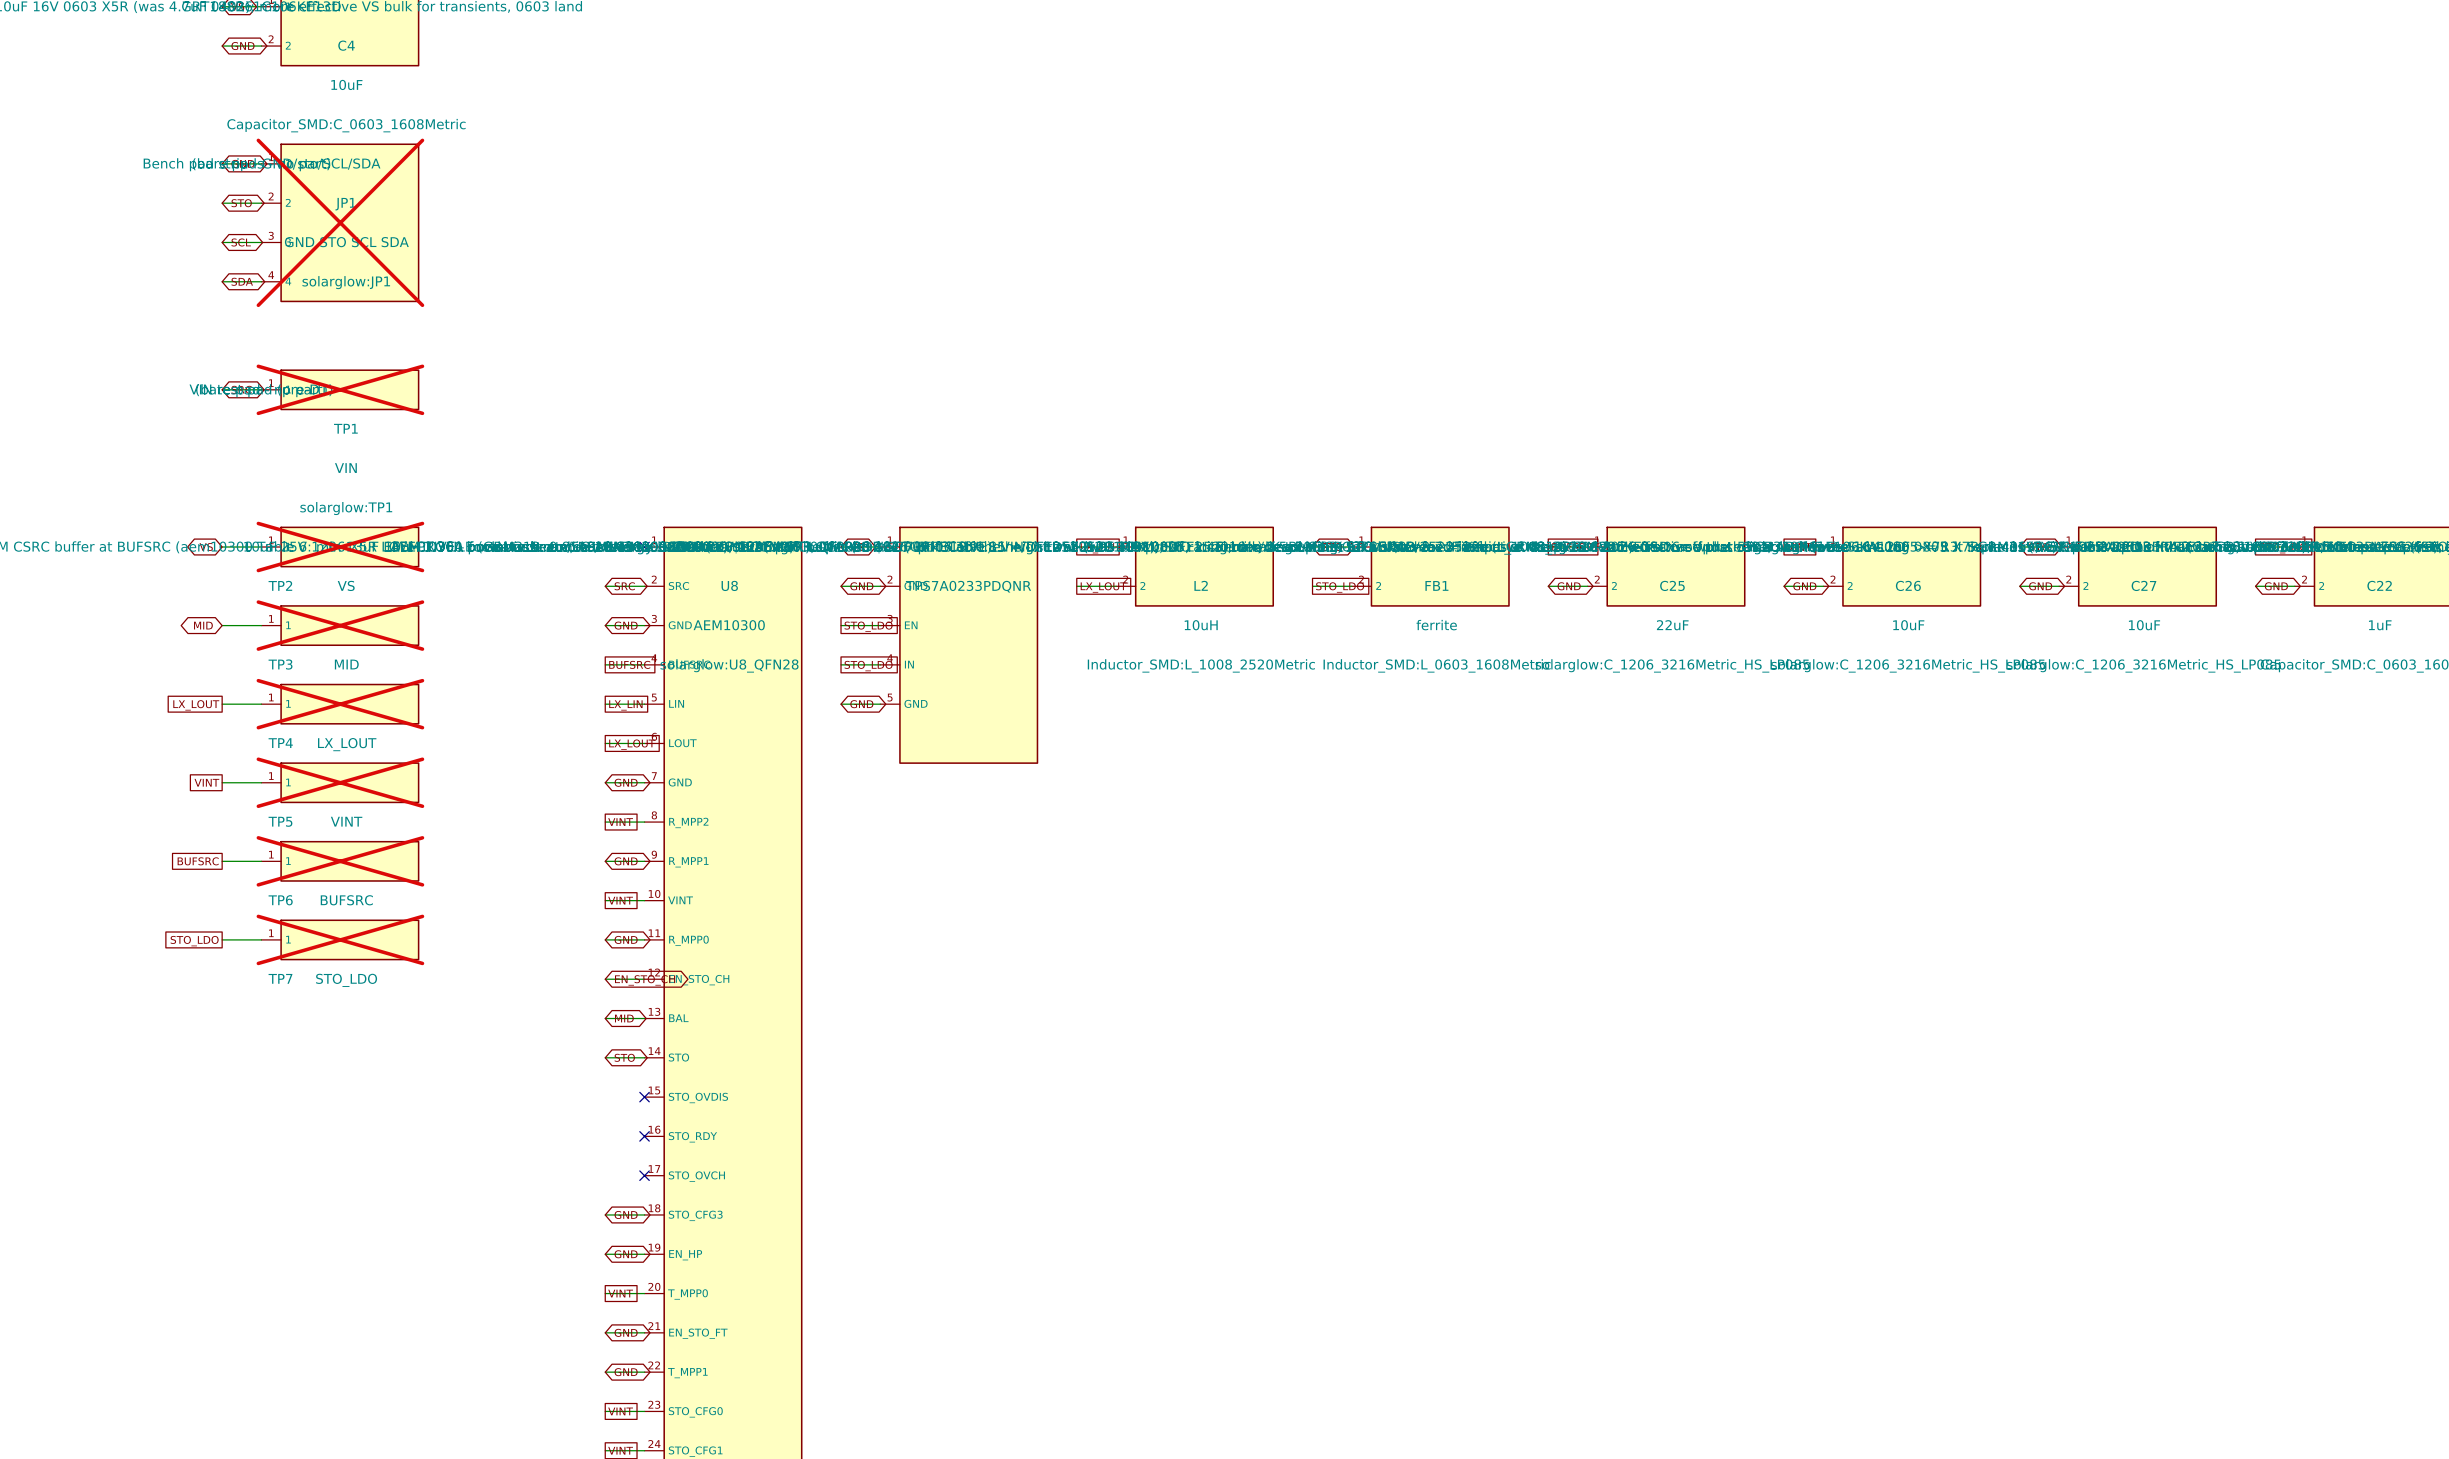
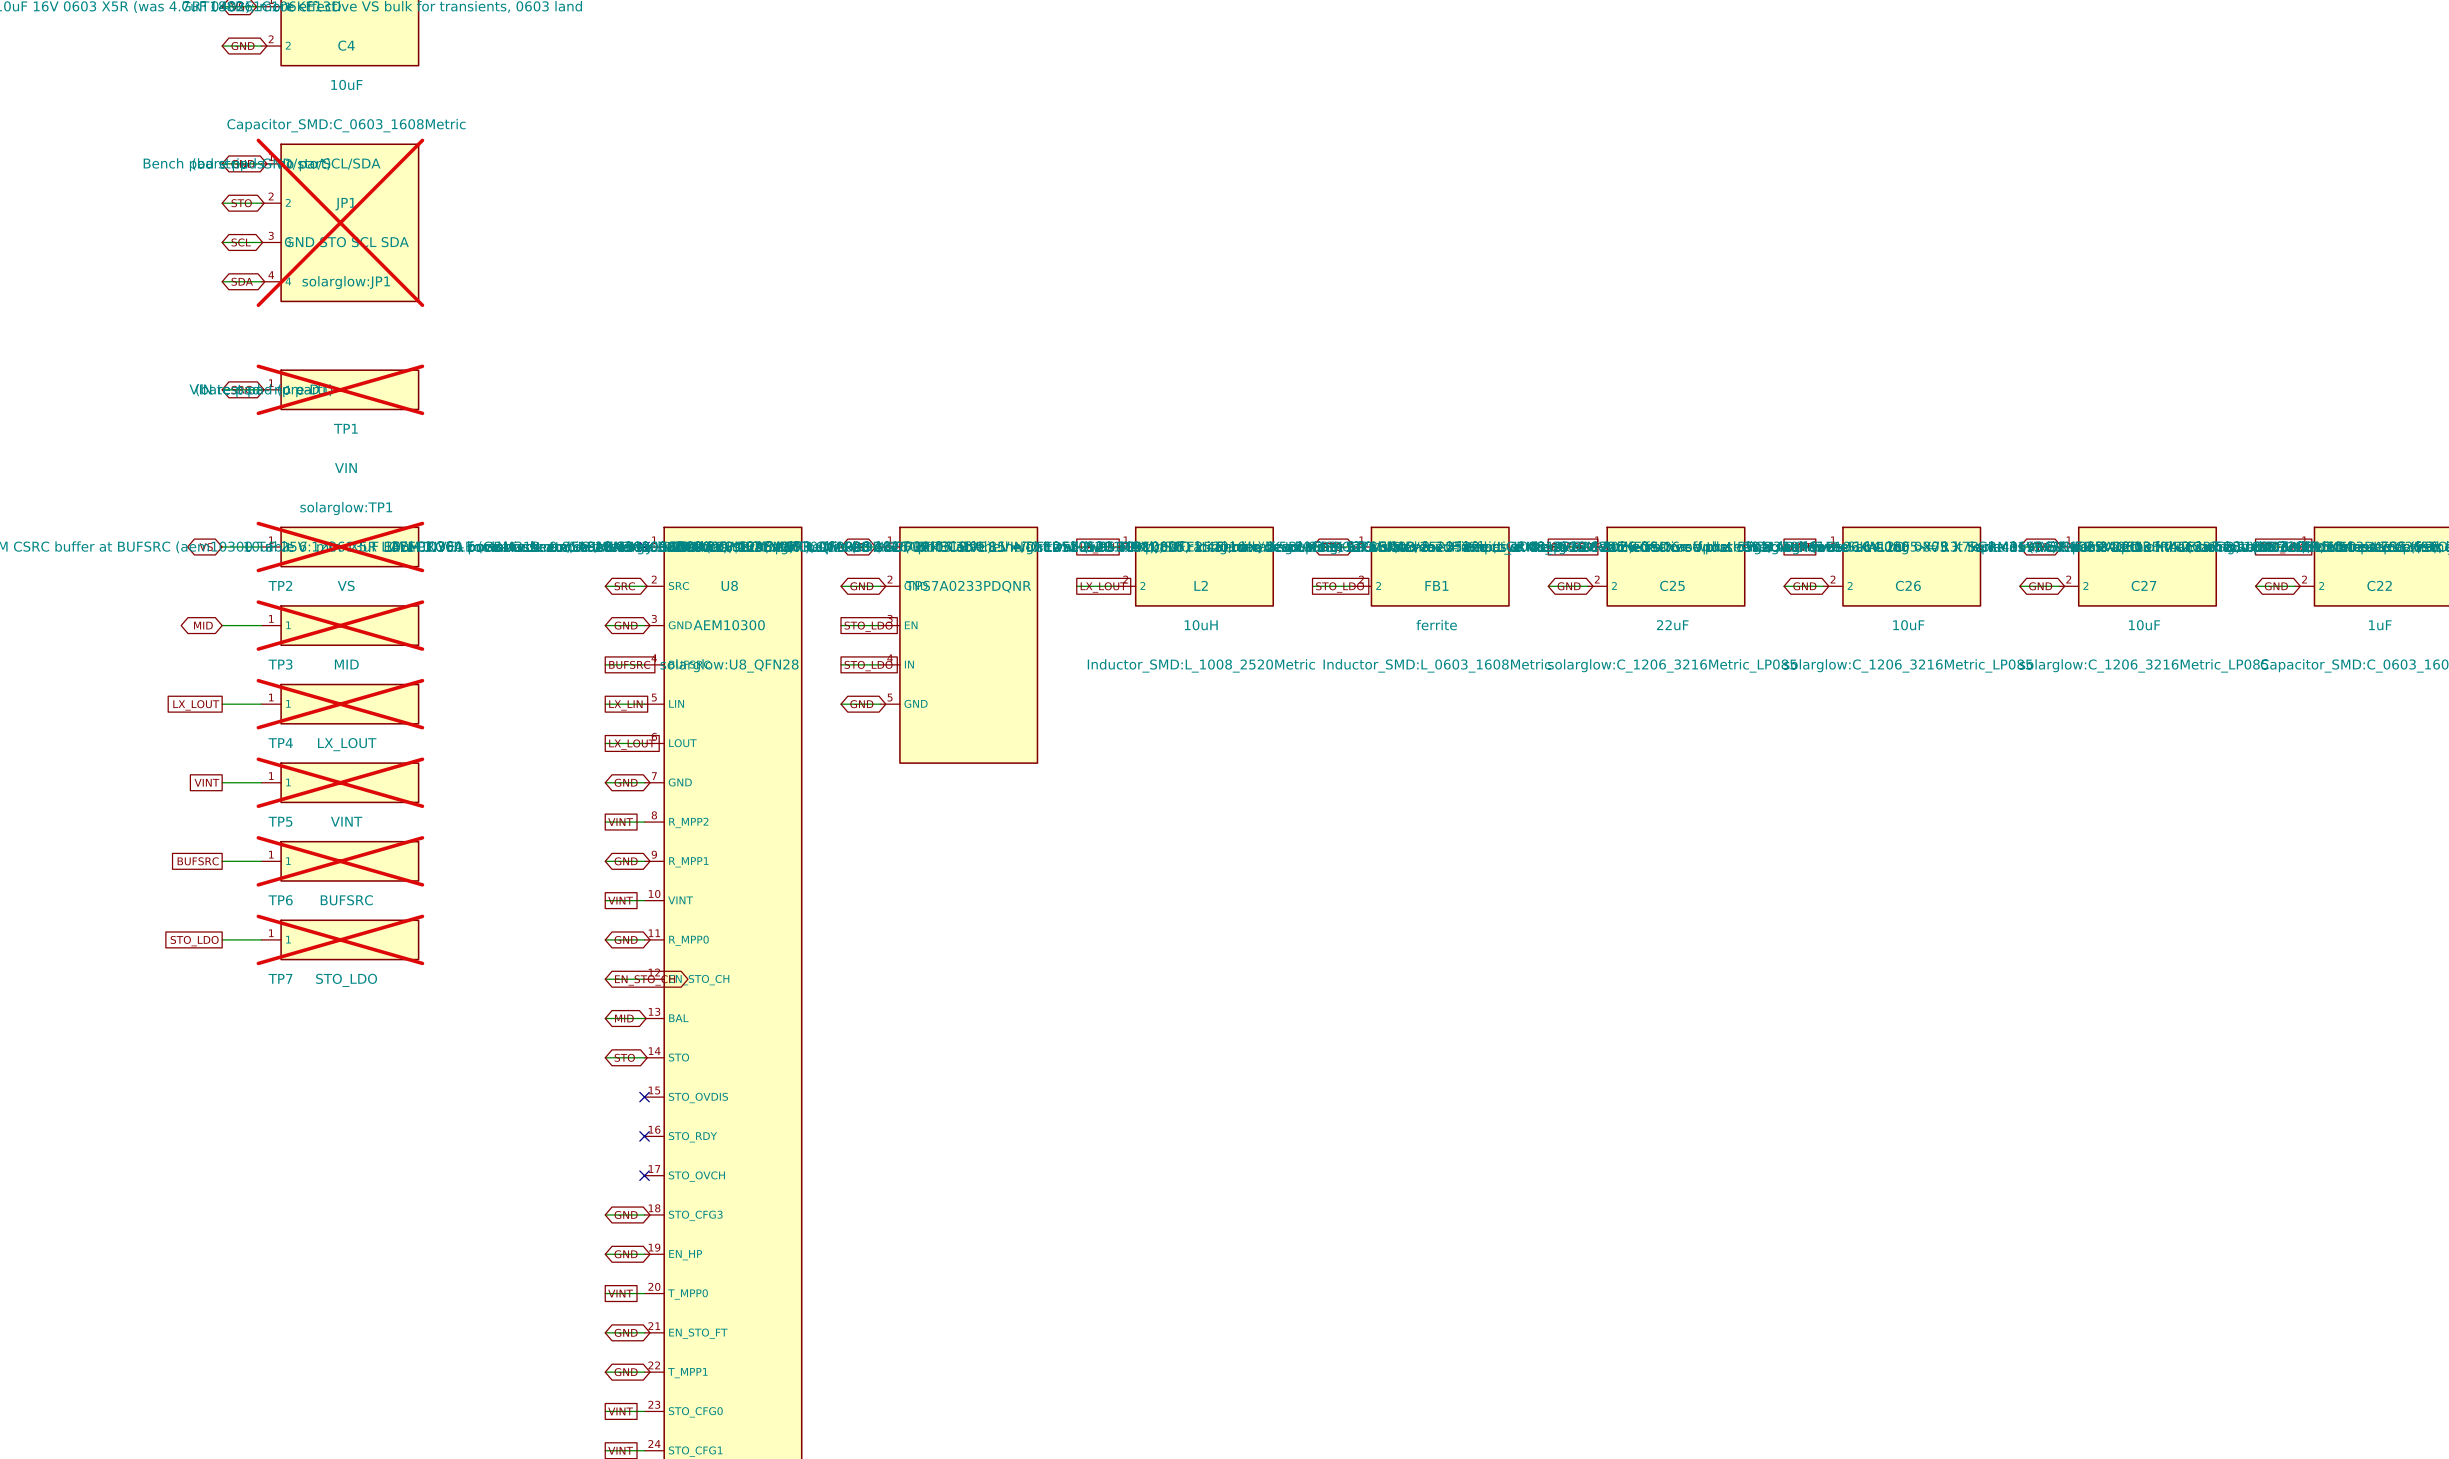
C25 text: solarglow:C_1206_3216Metric_HS_LP085 (1672, 665) -> solarglow:C_1206_3216Metric_LP085 (1672, 665)
C26 text: solarglow:C_1206_3216Metric_HS_LP085 (1908, 665) -> solarglow:C_1206_3216Metric_LP085 (1908, 665)
C27 text: solarglow:C_1206_3216Metric_HS_LP085 (2143, 665) -> solarglow:C_1206_3216Metric_LP085 (2143, 665)

